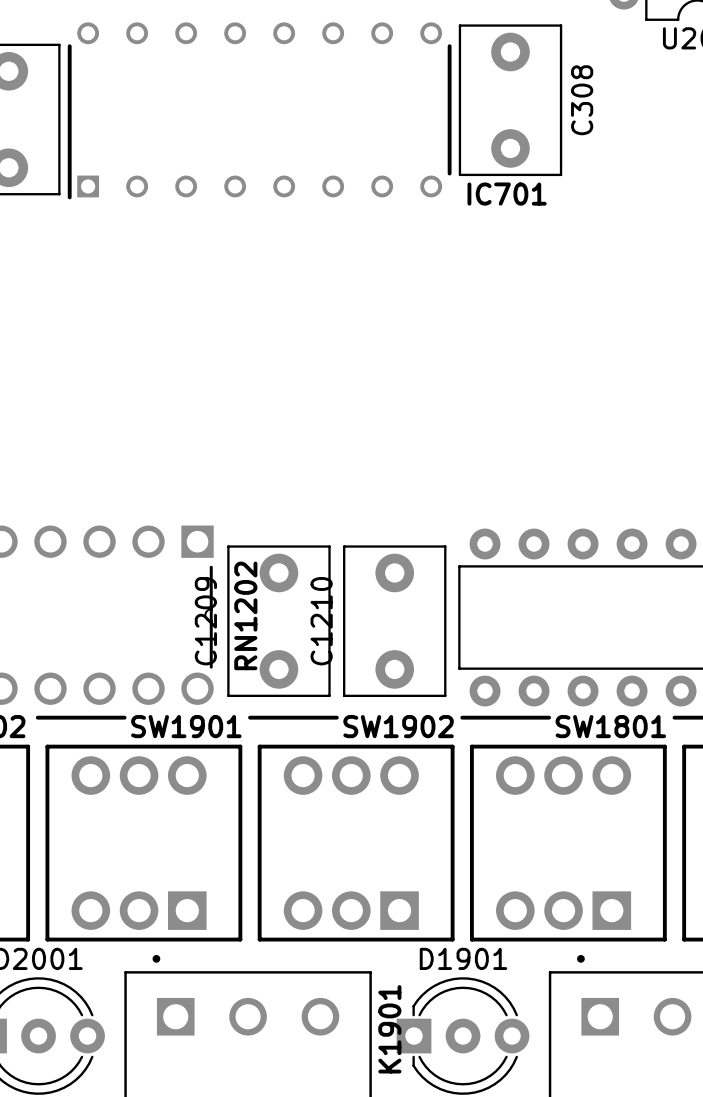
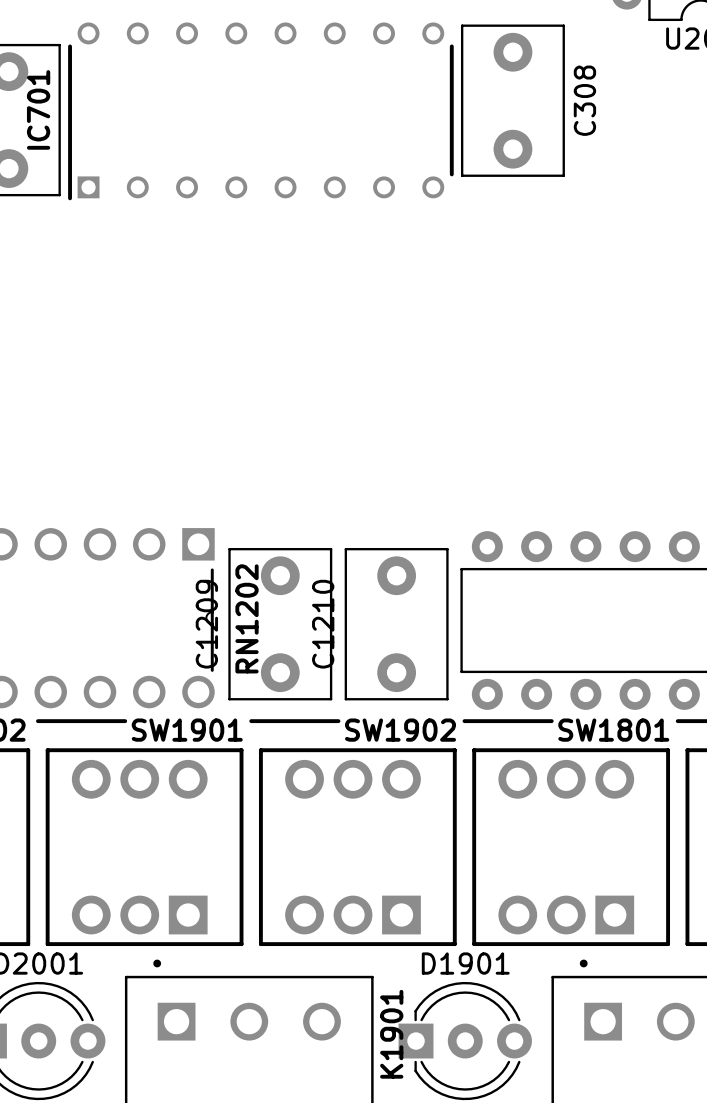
IC701 name rotation: 0° (507, 194) -> 90° counterclockwise (38, 109)
IC701 name position: IC701 (507, 194) -> IC701 (38, 109)

